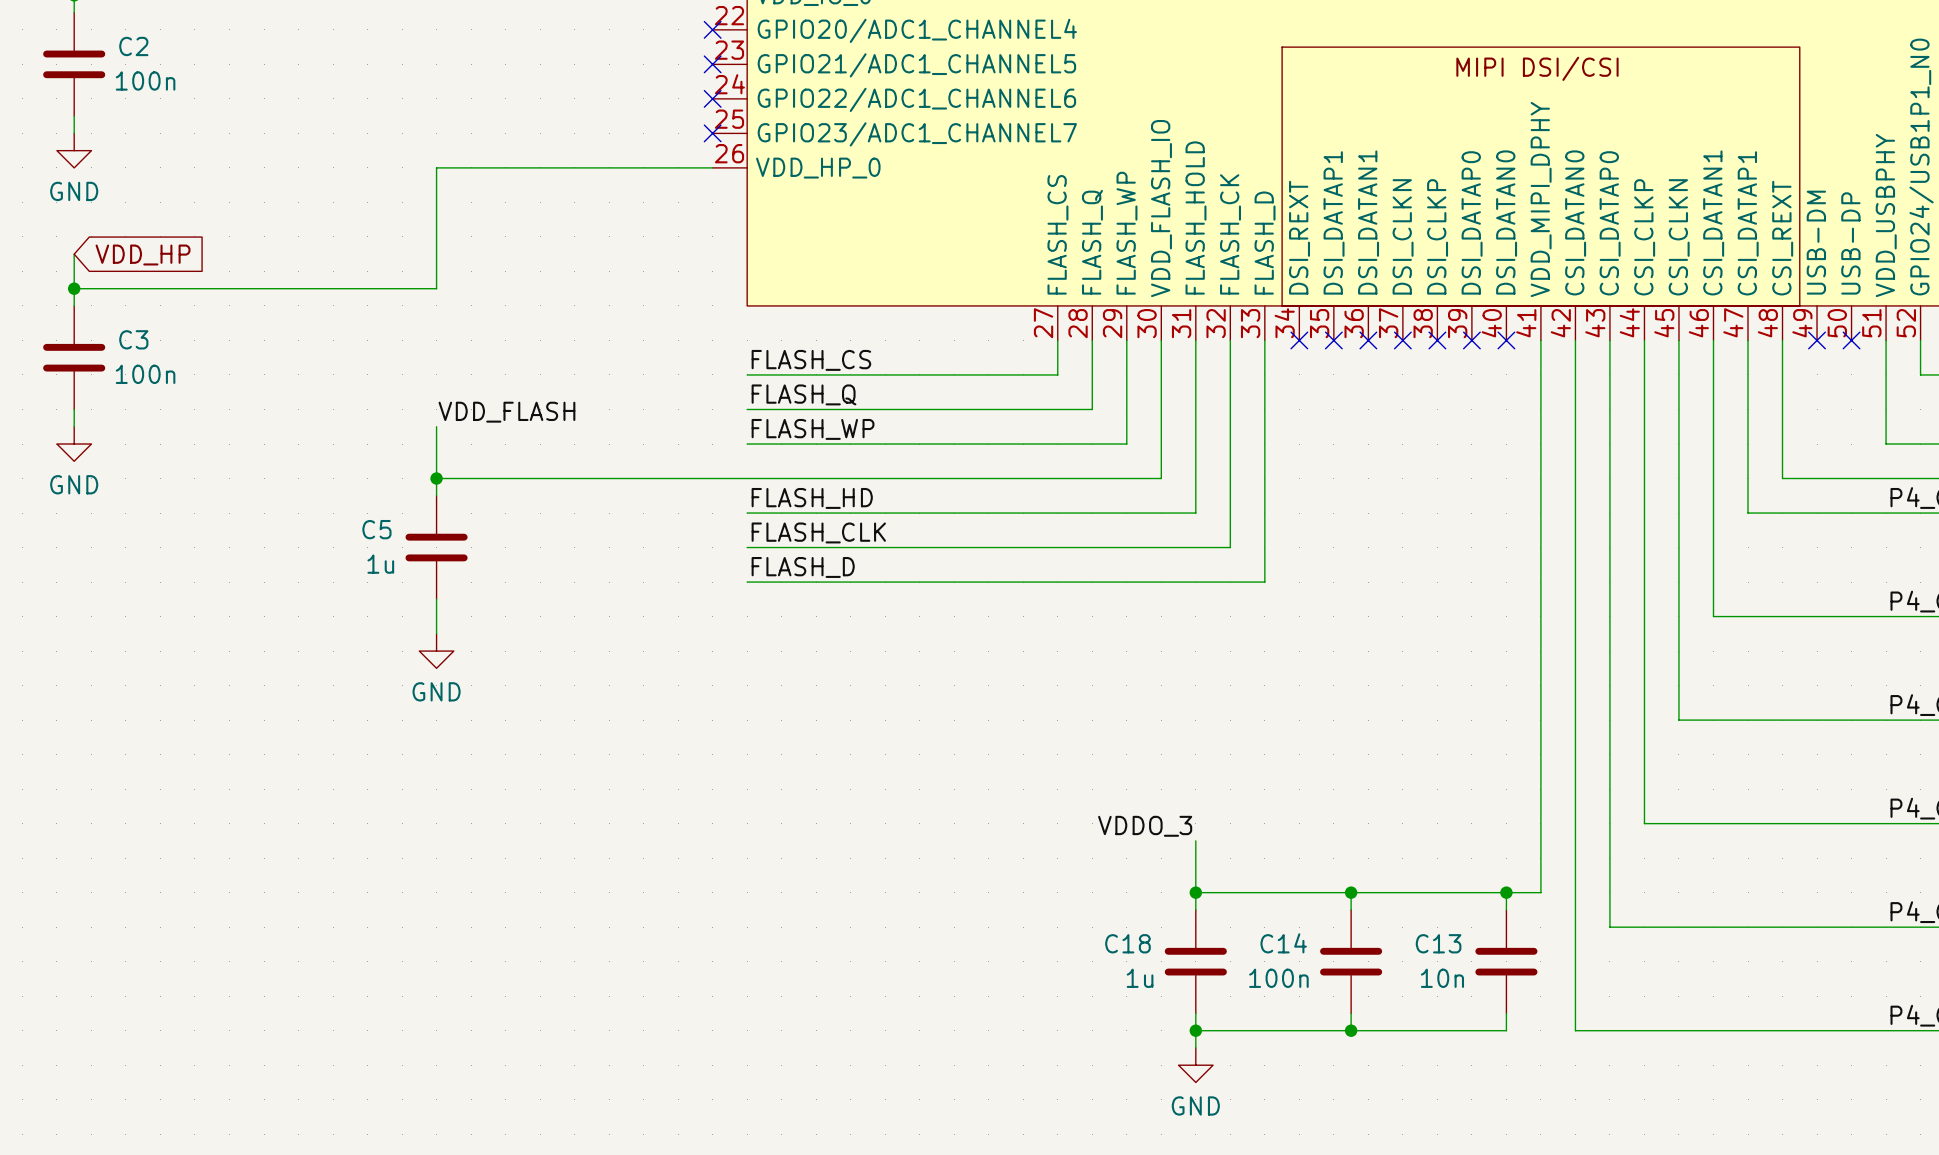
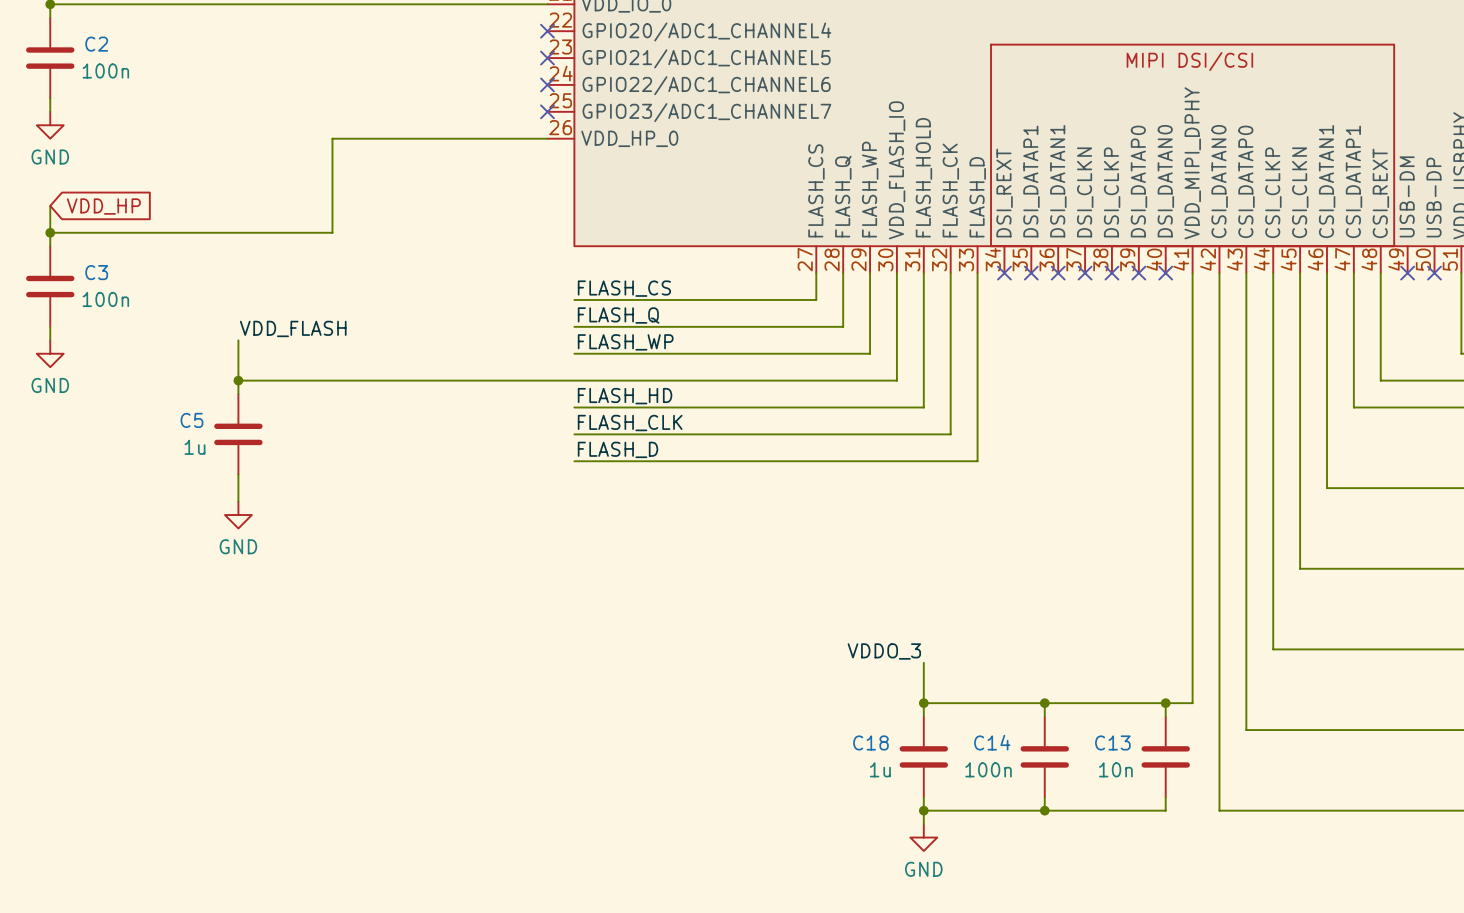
label position: VDD_FLASH (506, 412) -> VDD_FLASH (293, 328)
wire: (436, 426) (436, 495) -> (238, 340) (238, 394)
wire: none -> (238, 380) (332, 380)
junction: none -> (238, 380)
junction: (436, 478) -> none
C5 position: (436, 547) -> (238, 434)
wire: (436, 599) (436, 633) -> (238, 474) (238, 501)
power symbol position: GND (436, 651) -> GND (238, 515)

